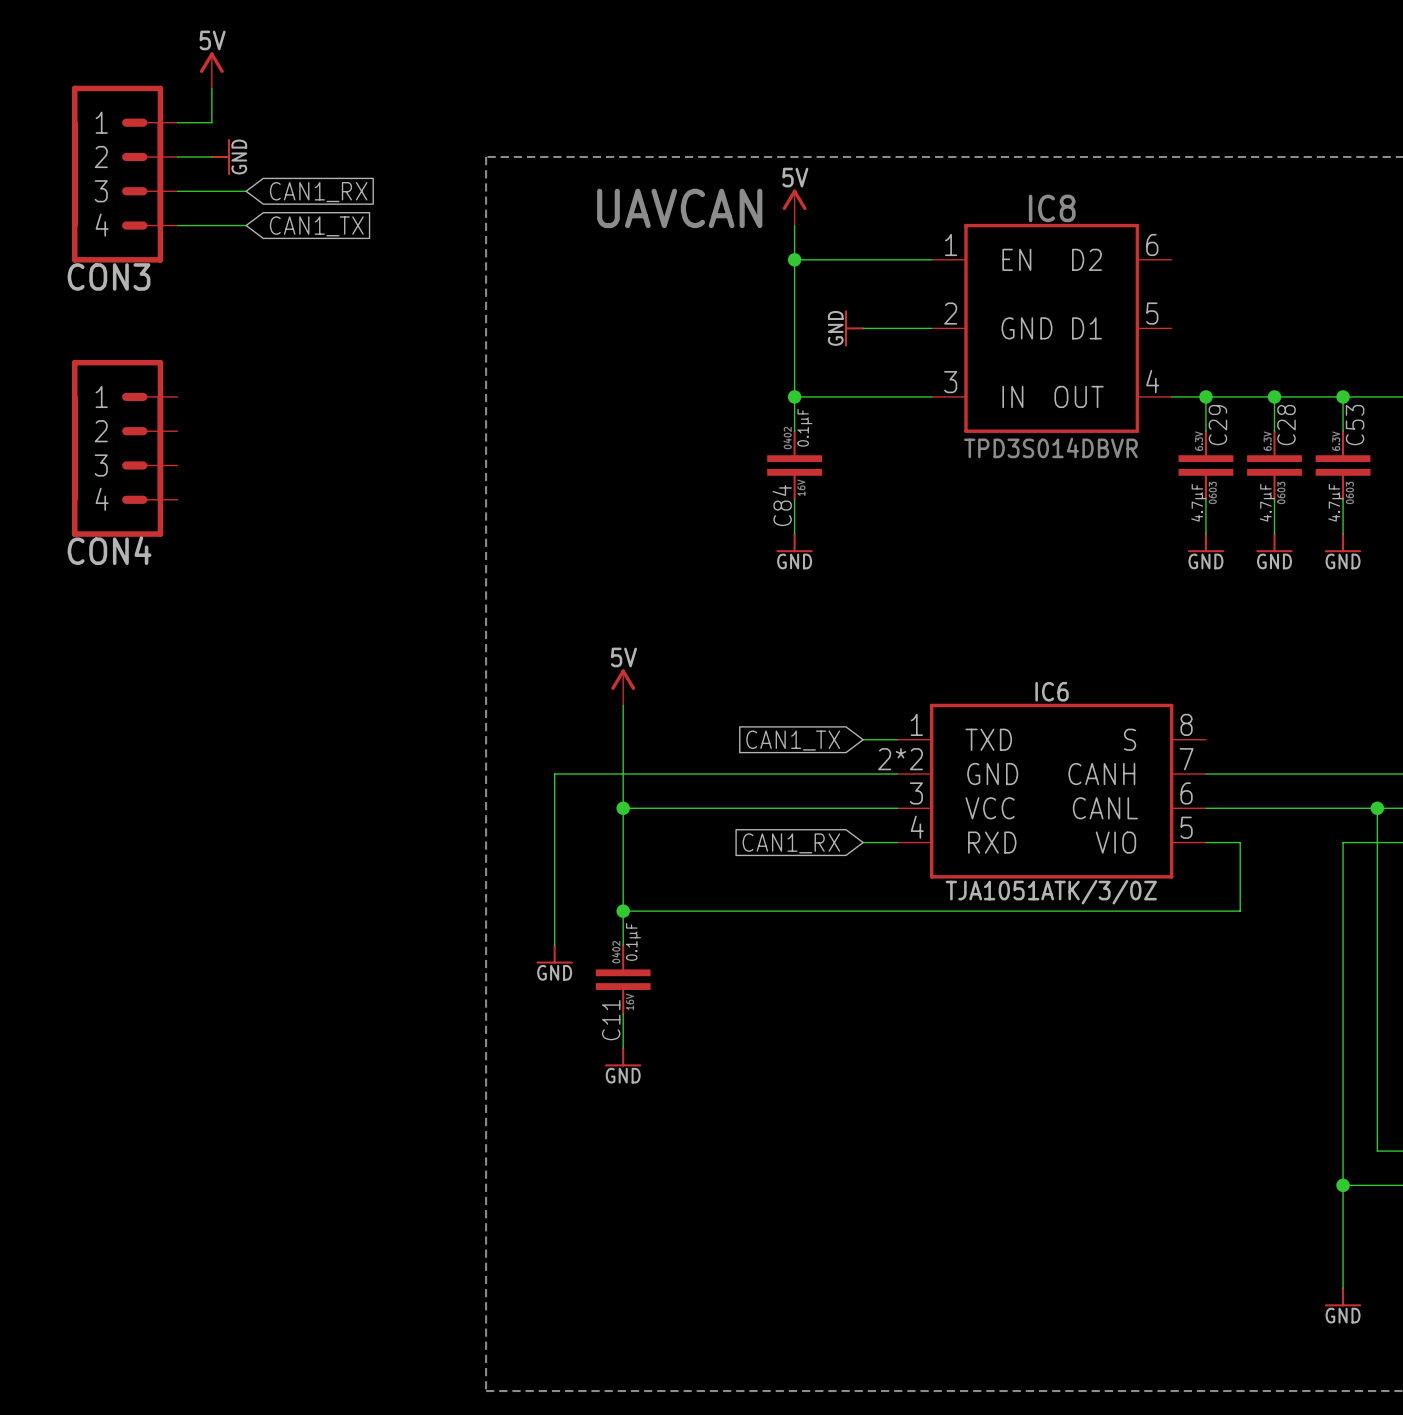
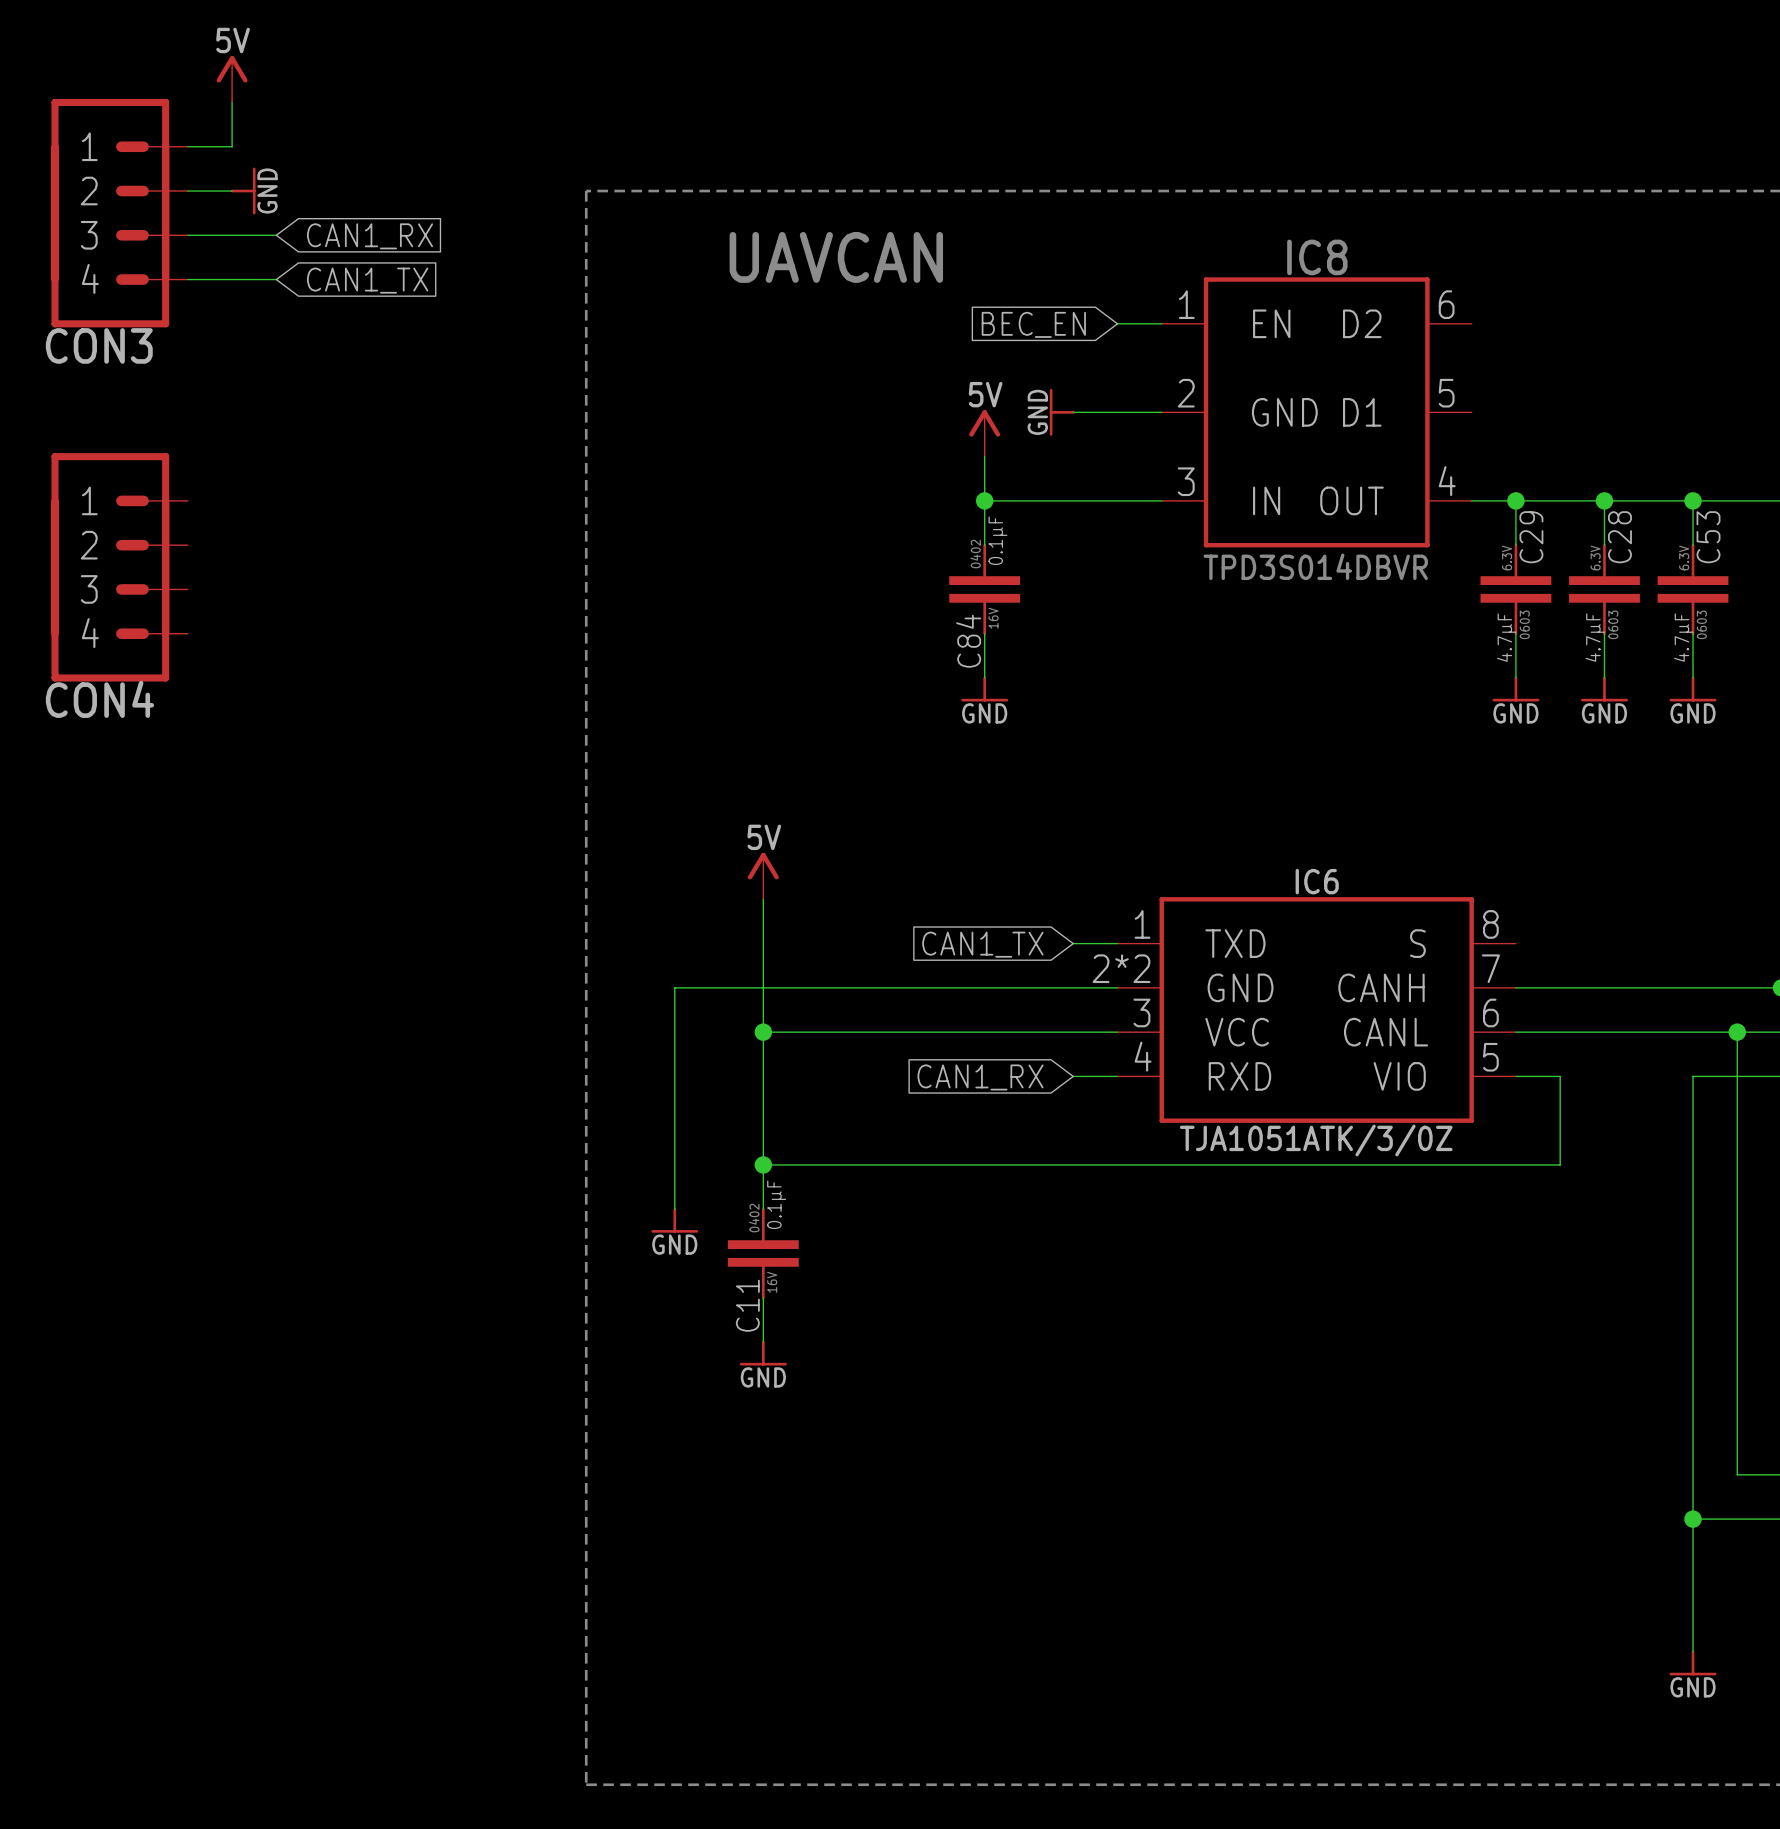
power symbol position: 5V (794, 207) -> 5V (984, 433)
wire: (794, 225) (794, 362) -> none
wire: (794, 259) (897, 259) -> none
junction: (794, 259) -> none
global label: none -> BEC_EN (1033, 324)

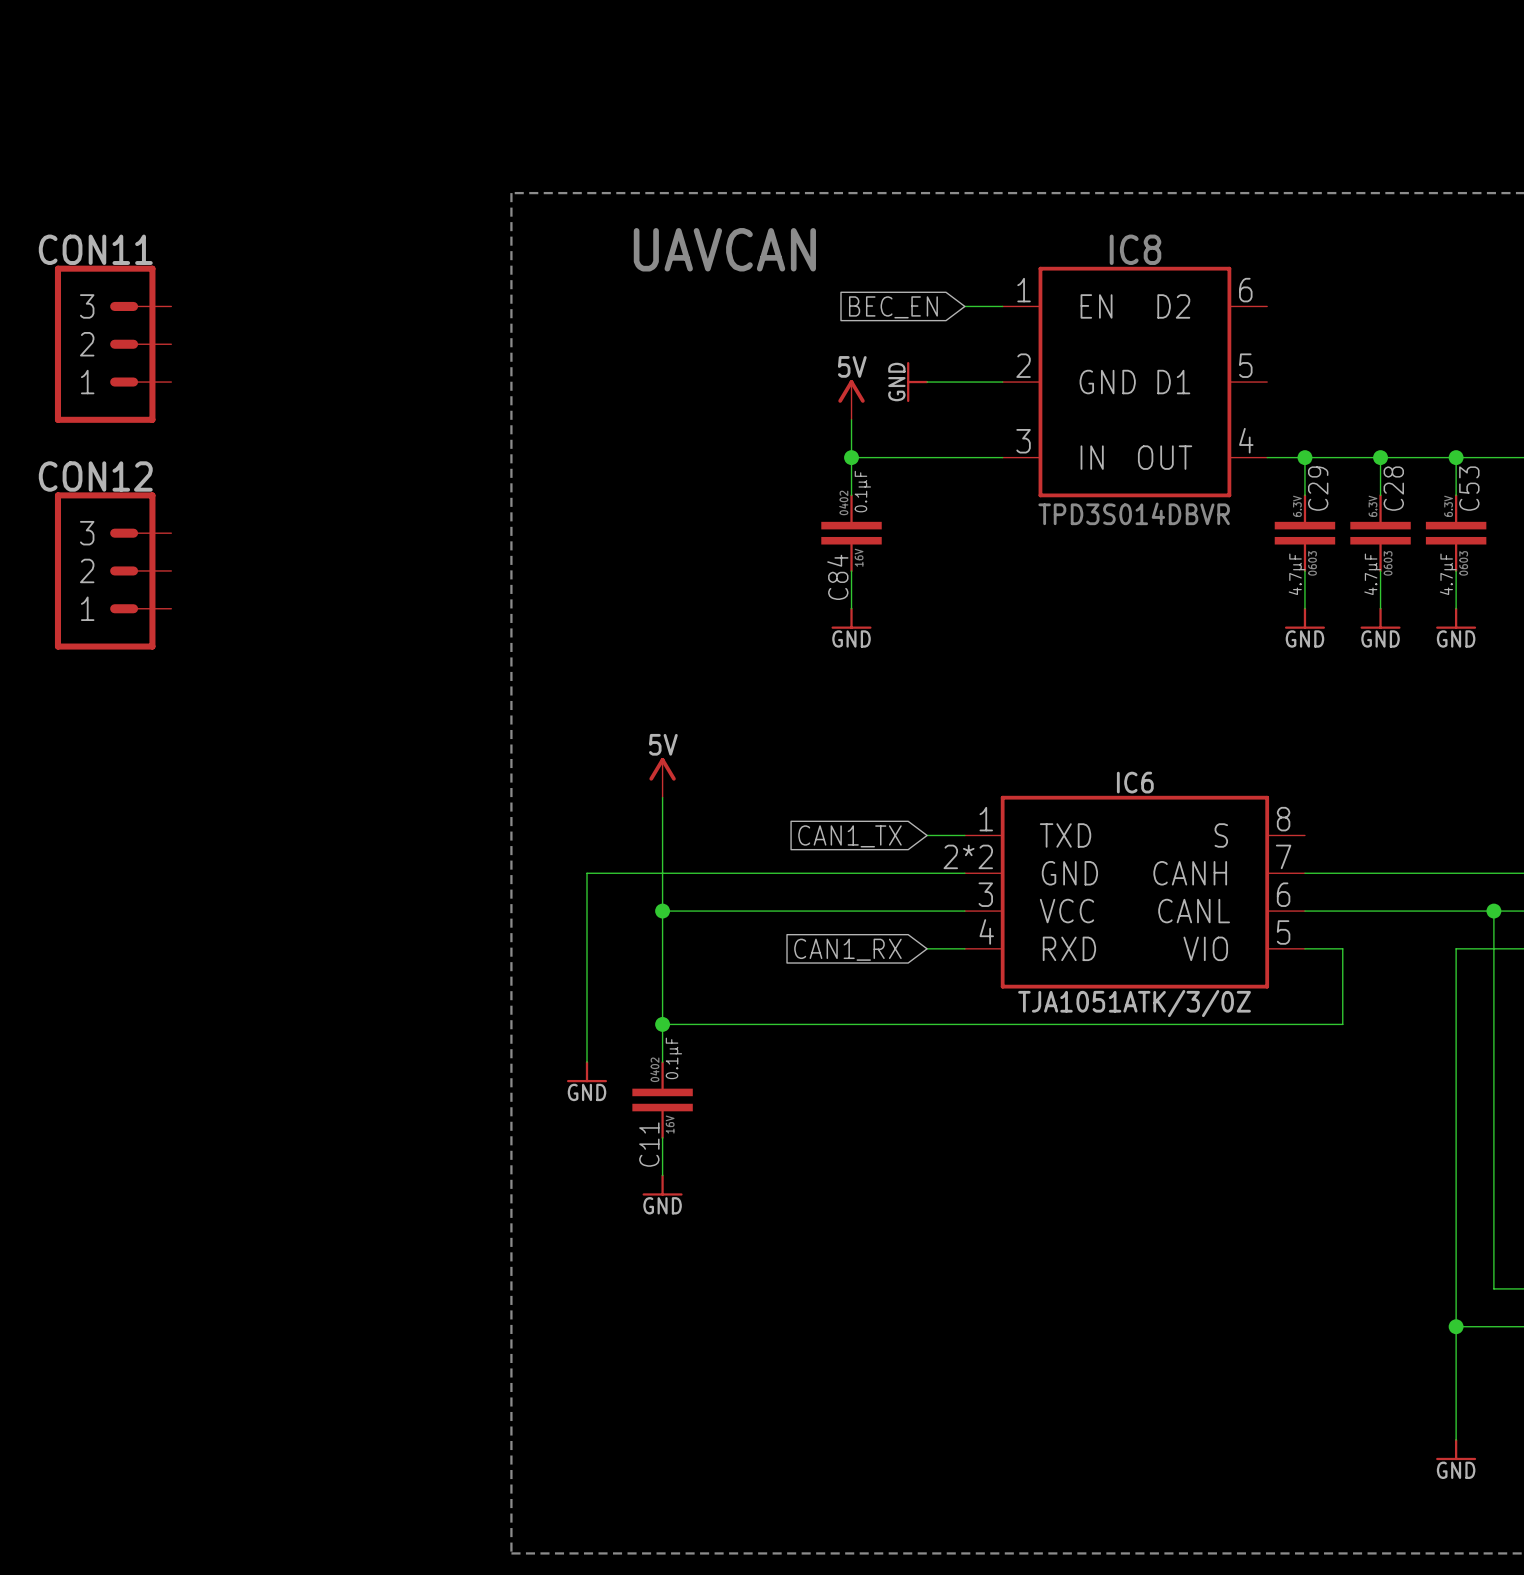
power symbol: 5V (232, 79) -> none
wire: (232, 102) (232, 146) (187, 146) -> none
wire: (187, 191) (232, 191) -> none
power symbol: GND (243, 191) -> none
CON3: (119, 213) -> none
wire: (187, 235) (276, 235) -> none
global label: CAN1_RX (370, 236) -> none
wire: (187, 279) (276, 279) -> none
global label: CAN1_TX (367, 280) -> none
CON11: none -> (113, 344)
CON4: (119, 567) -> none
CON12: none -> (113, 570)

